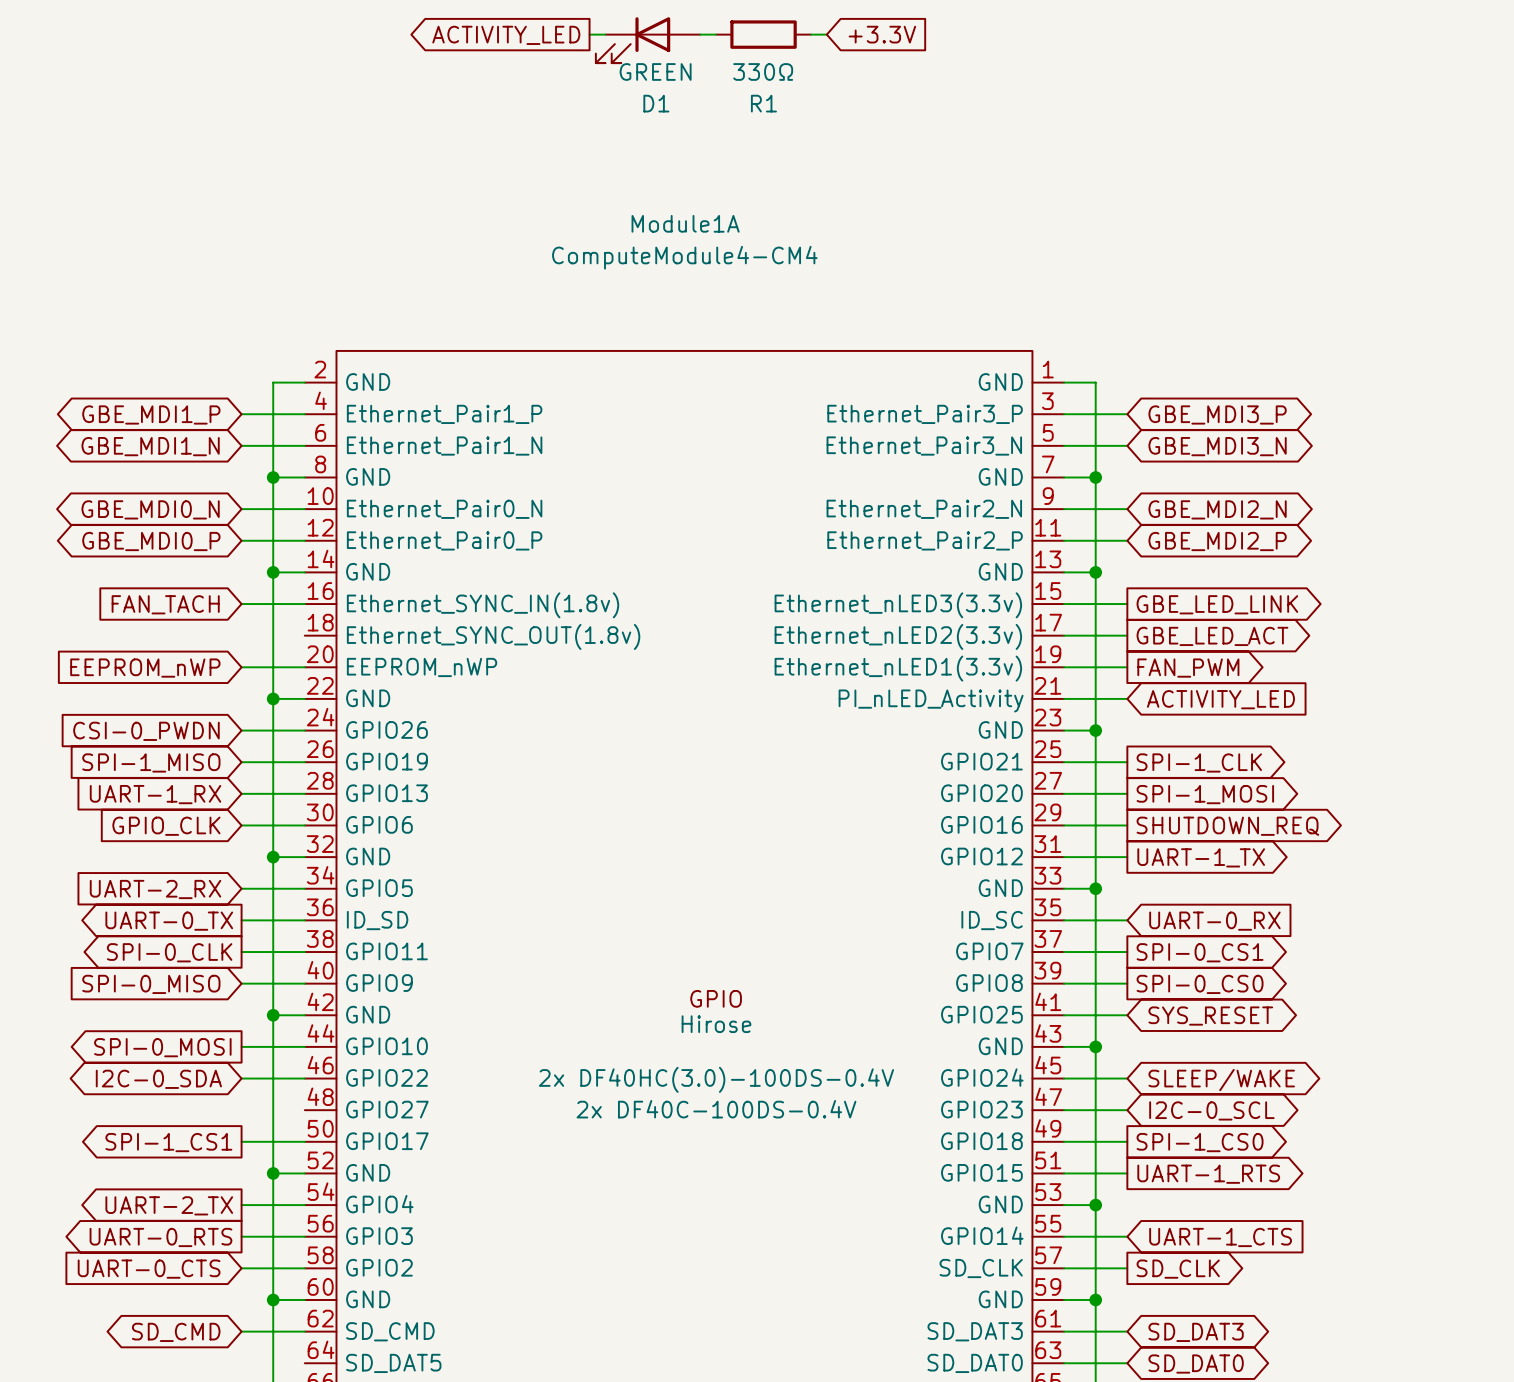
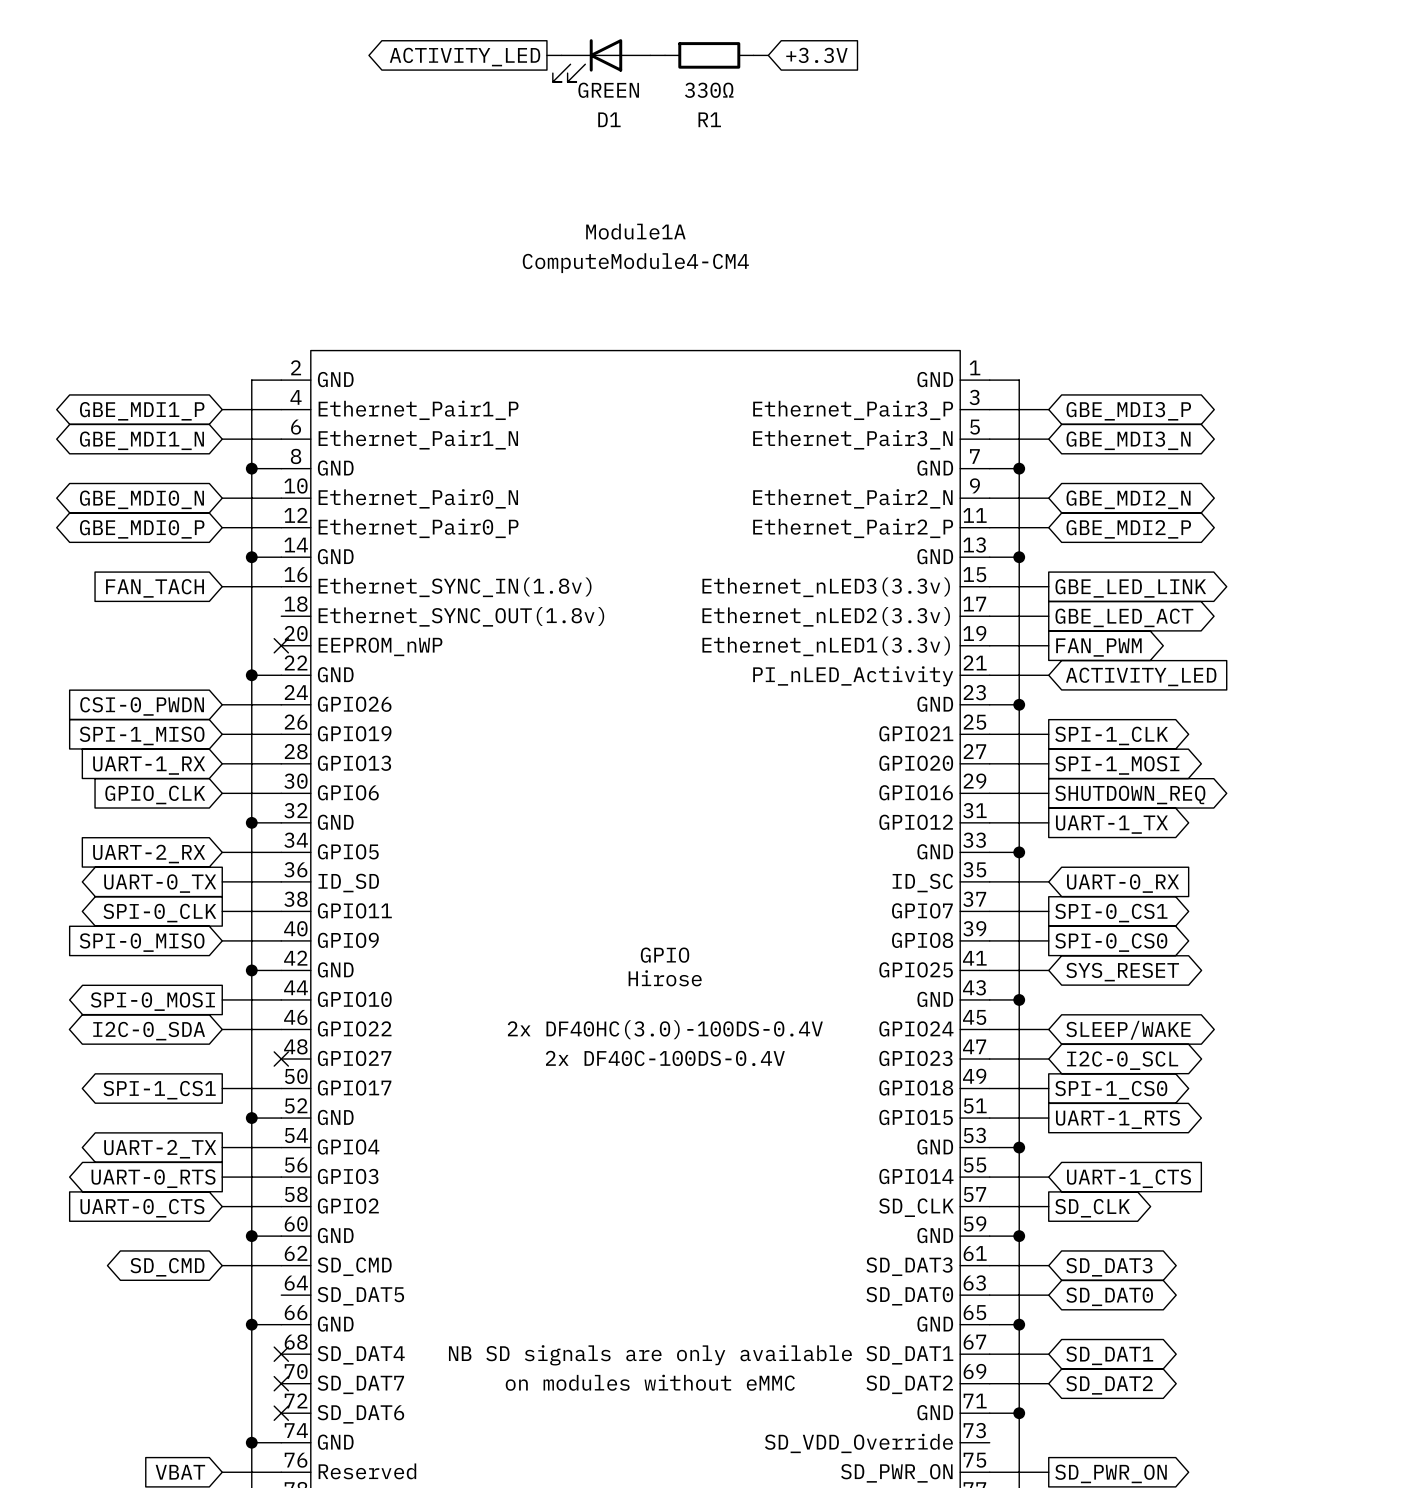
wire: (241, 667) (304, 667) -> none
no-connect mark: none -> (281, 645)
global label: EEPROM_nWP (145, 668) -> none
no-connect mark: none -> (281, 1059)

